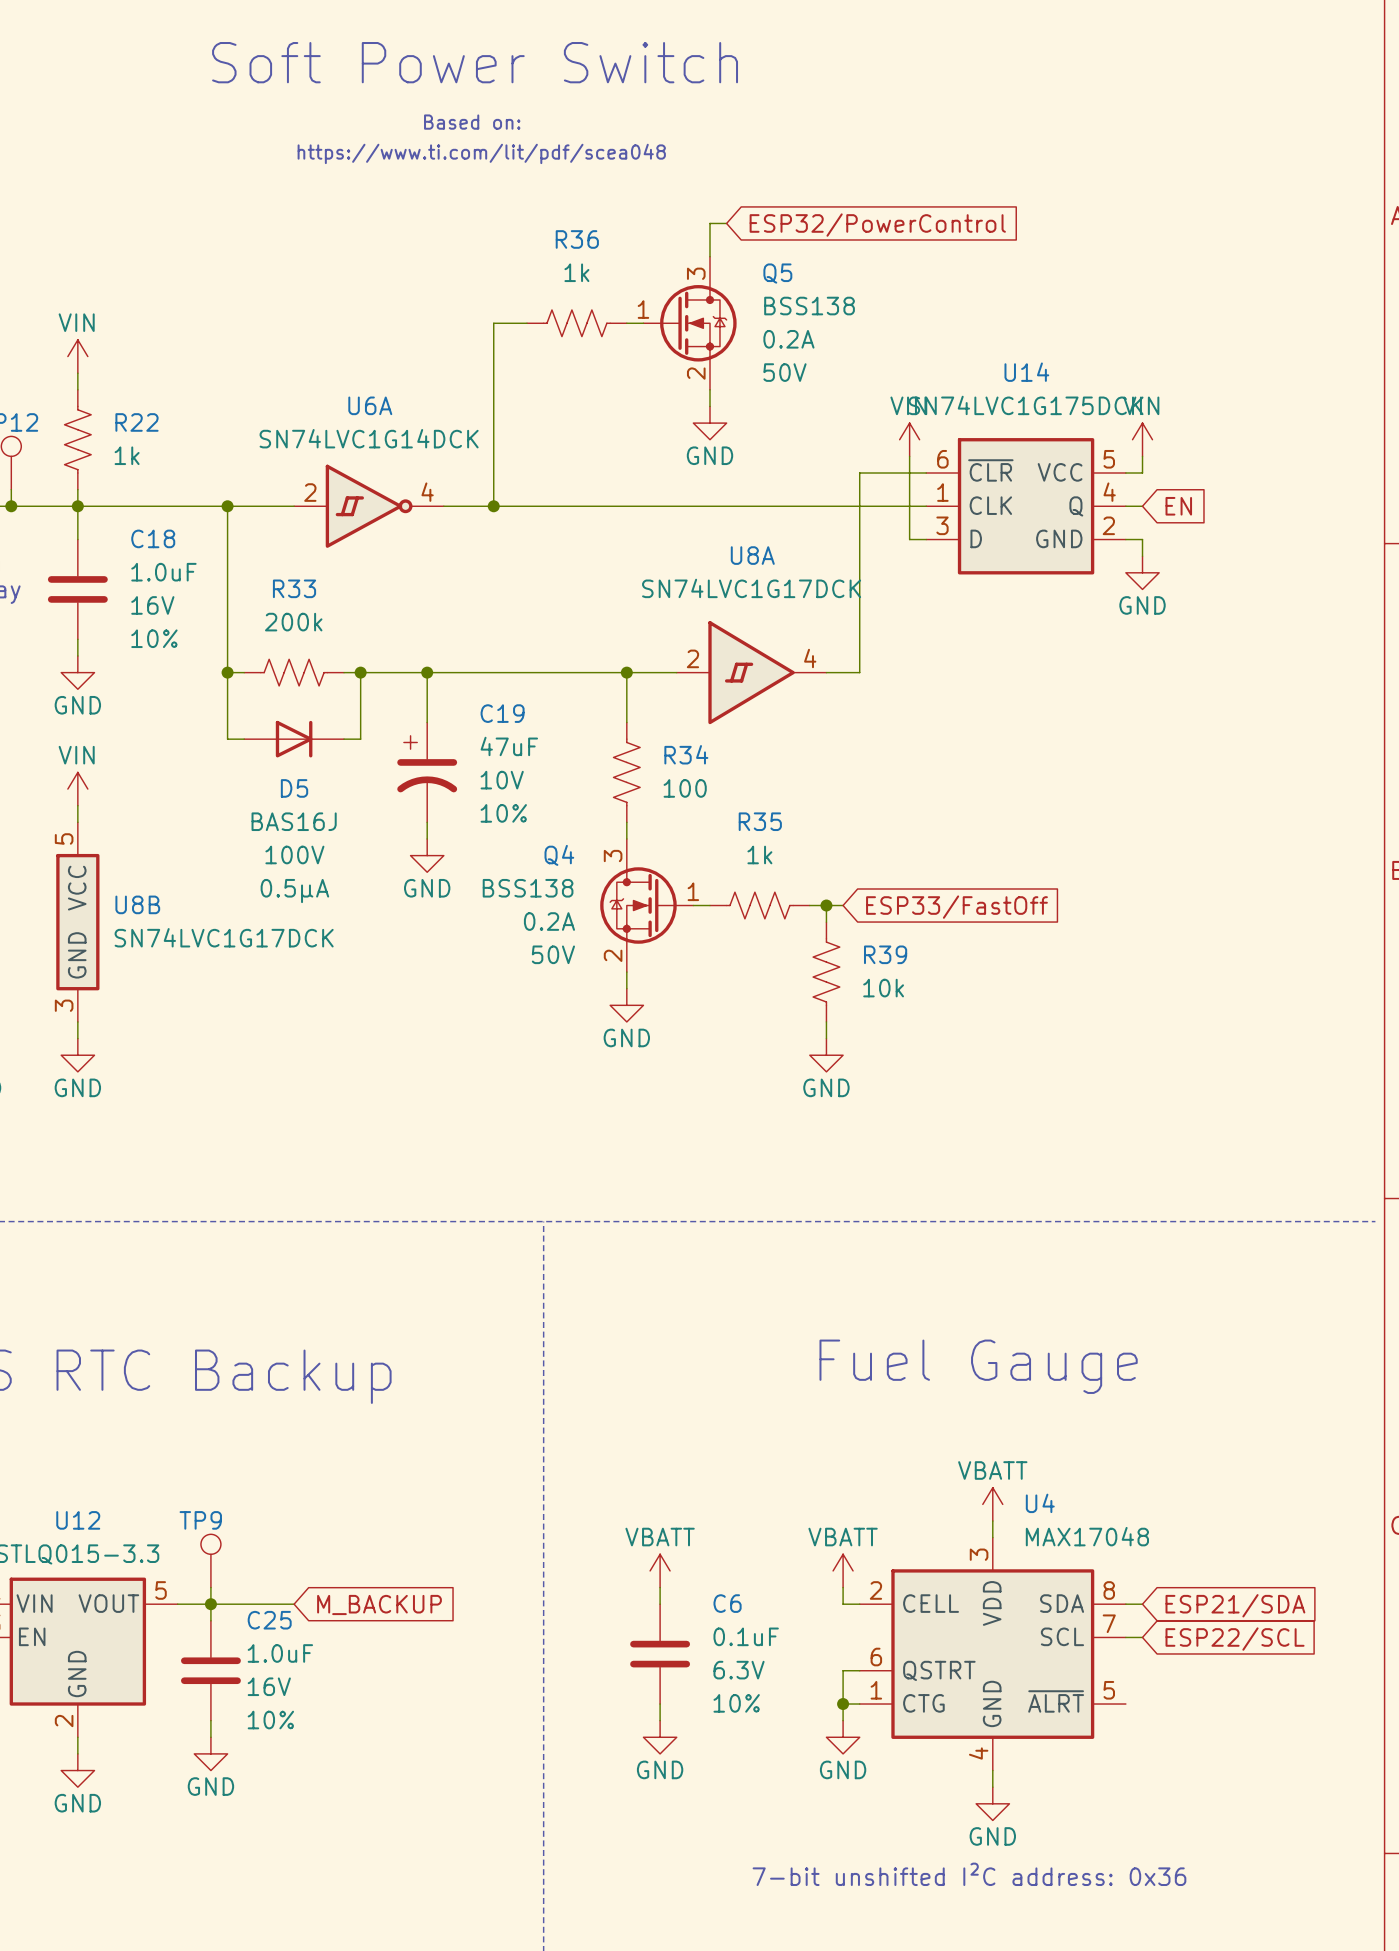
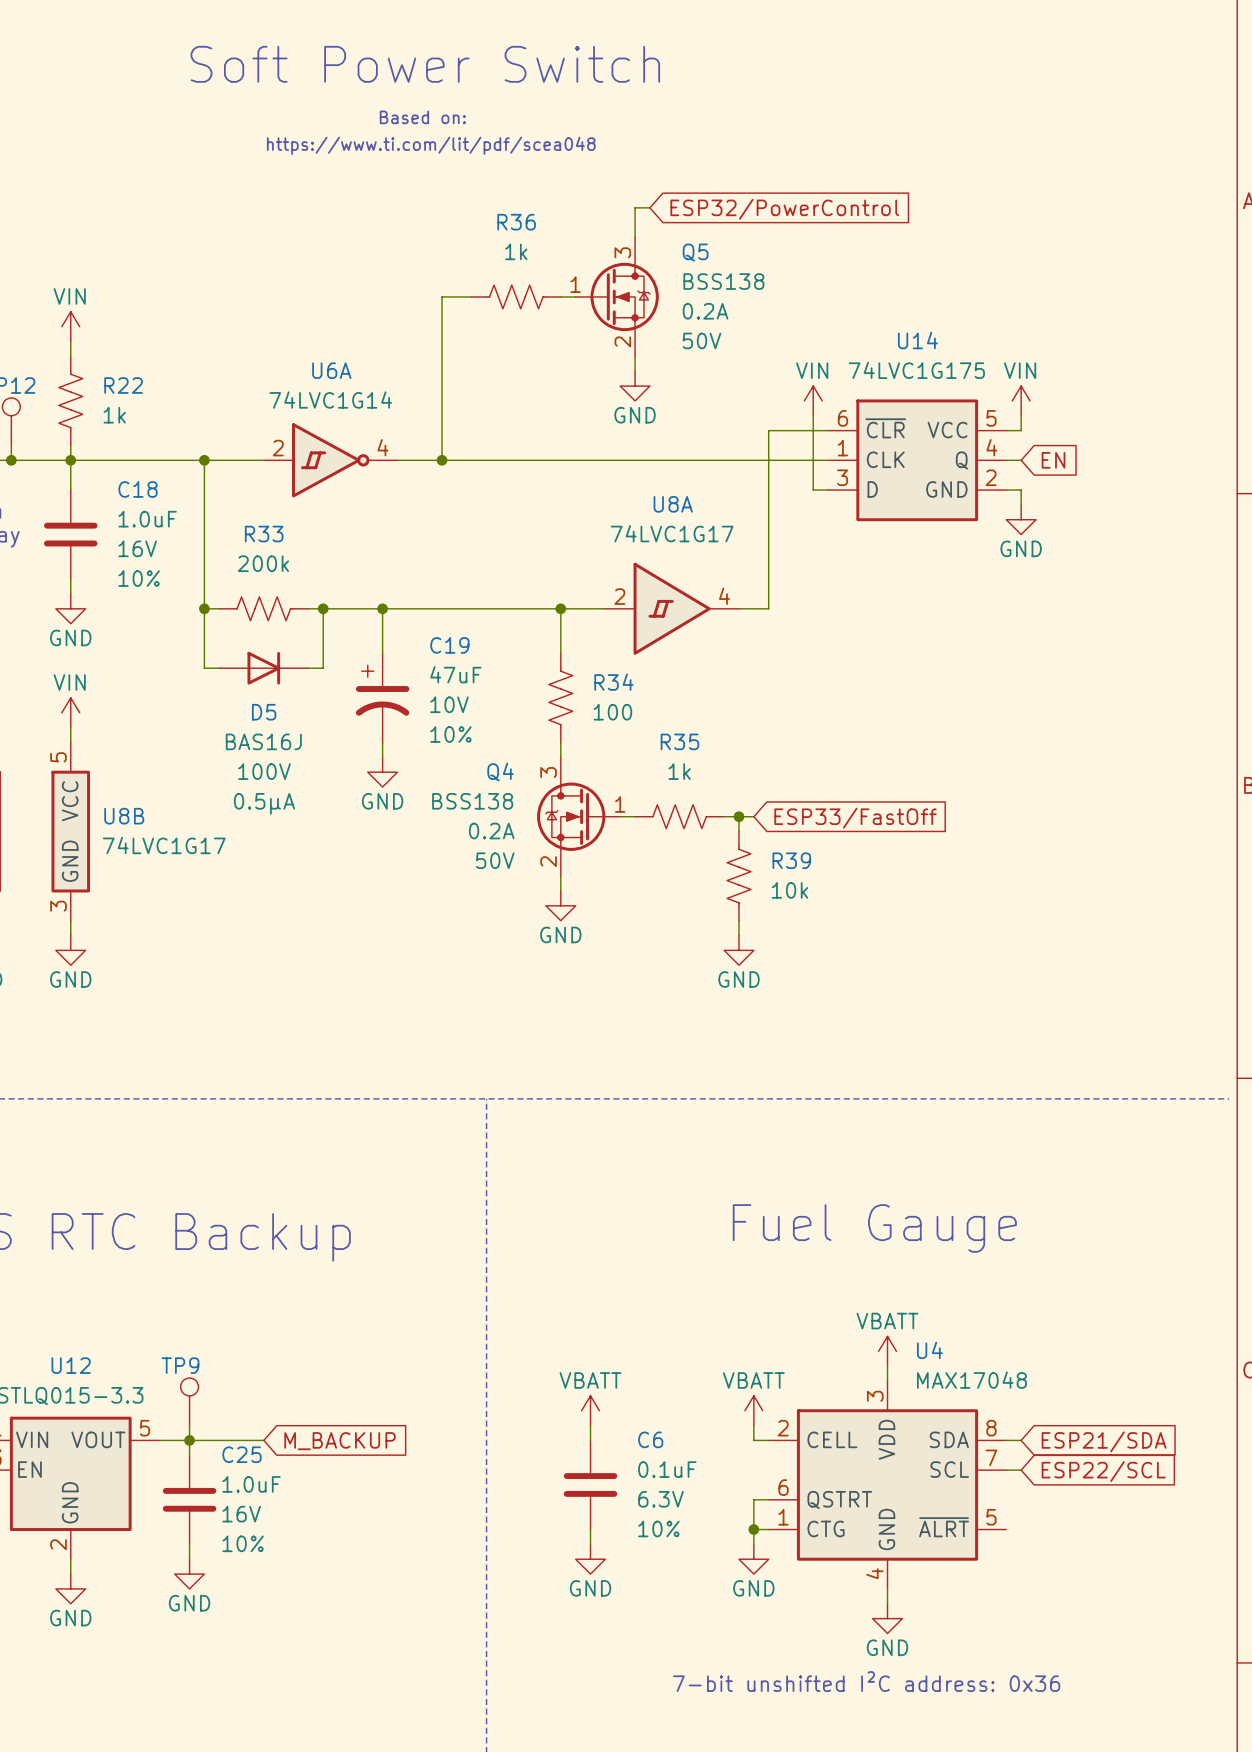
U14 value: SN74LVC1G175DCK (1026, 405) -> 74LVC1G175 (916, 370)
U6A value: SN74LVC1G14DCK (369, 438) -> 74LVC1G14 (330, 400)
U8A value: SN74LVC1G17DCK (751, 588) -> 74LVC1G17 (672, 533)
U8B value: SN74LVC1G17DCK (224, 937) -> 74LVC1G17 (164, 845)

